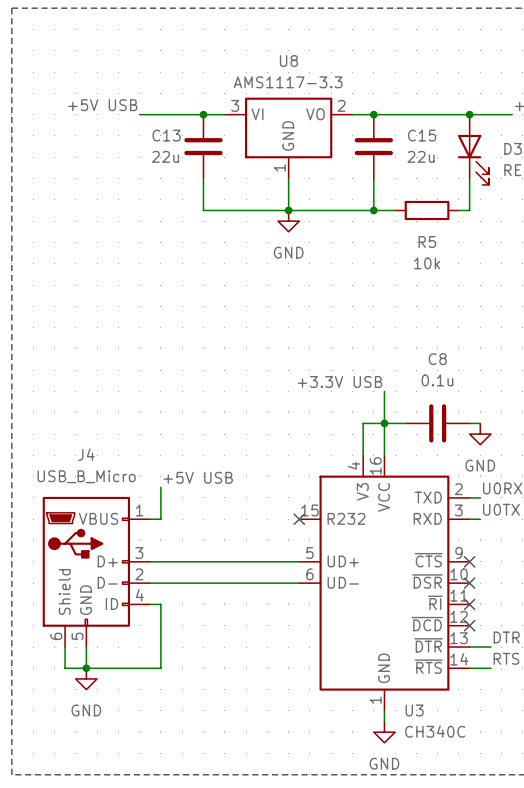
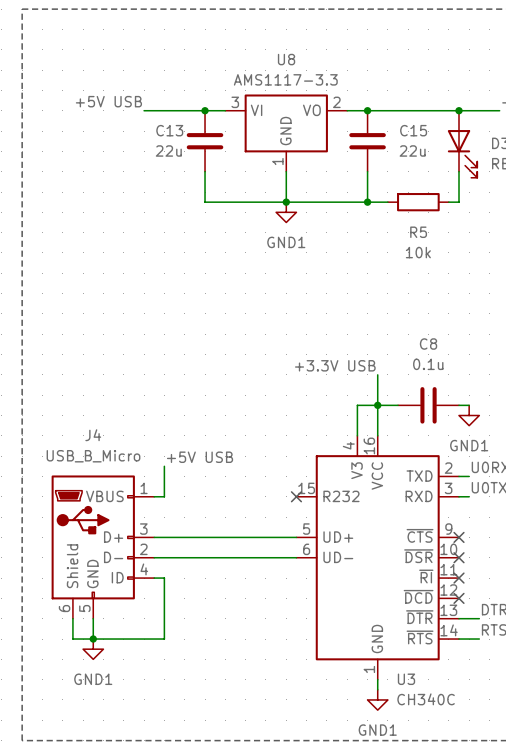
power symbol: GND (288, 221) -> GND1 (286, 212)
power symbol: GND (480, 434) -> GND1 (469, 415)
power symbol: GND (86, 678) -> GND1 (93, 649)
power symbol: GND (384, 732) -> GND1 (377, 699)

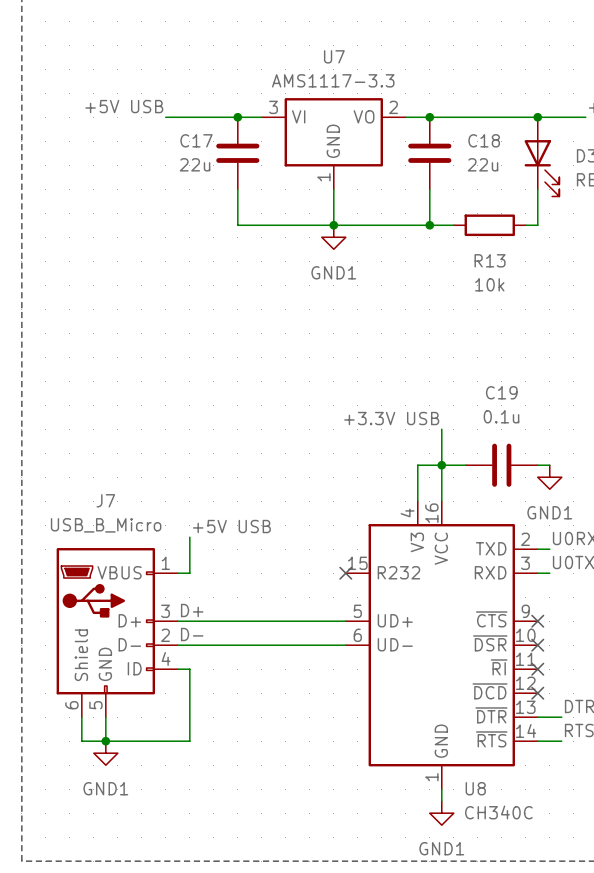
U8 name: U8 (286, 59) -> U7 (334, 56)
C13 name: C13 (169, 130) -> C17 (196, 140)
C15 name: C15 (413, 130) -> C18 (484, 140)
R5 name: R5 (418, 232) -> R13 (490, 260)
C8 name: C8 (428, 344) -> C19 (501, 392)
J4 name: J4 (93, 435) -> J7 (105, 500)
label: none -> D+ (192, 610)
label: none -> D- (192, 634)
U3 name: U3 (406, 679) -> U8 (475, 788)

